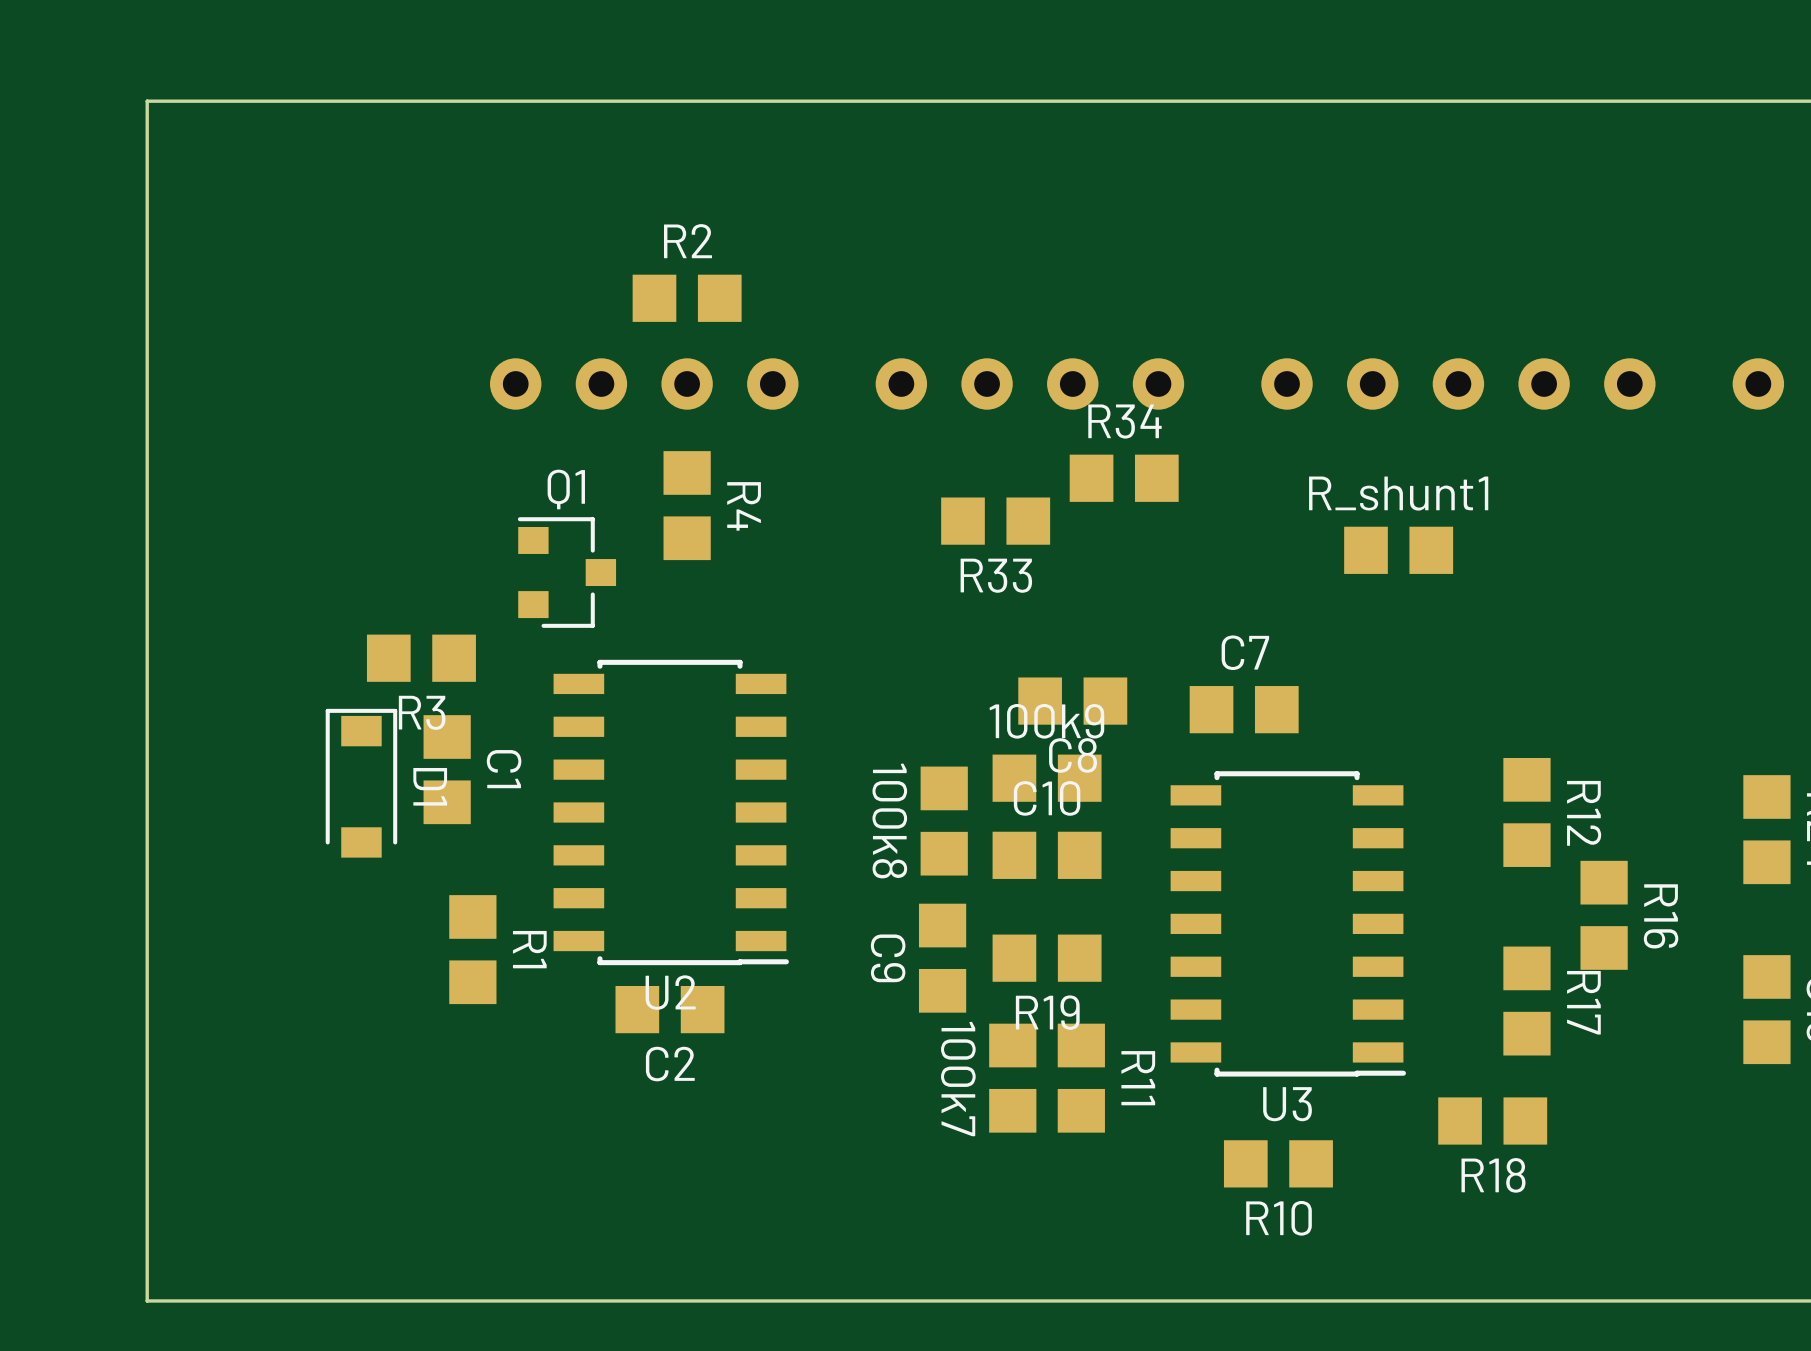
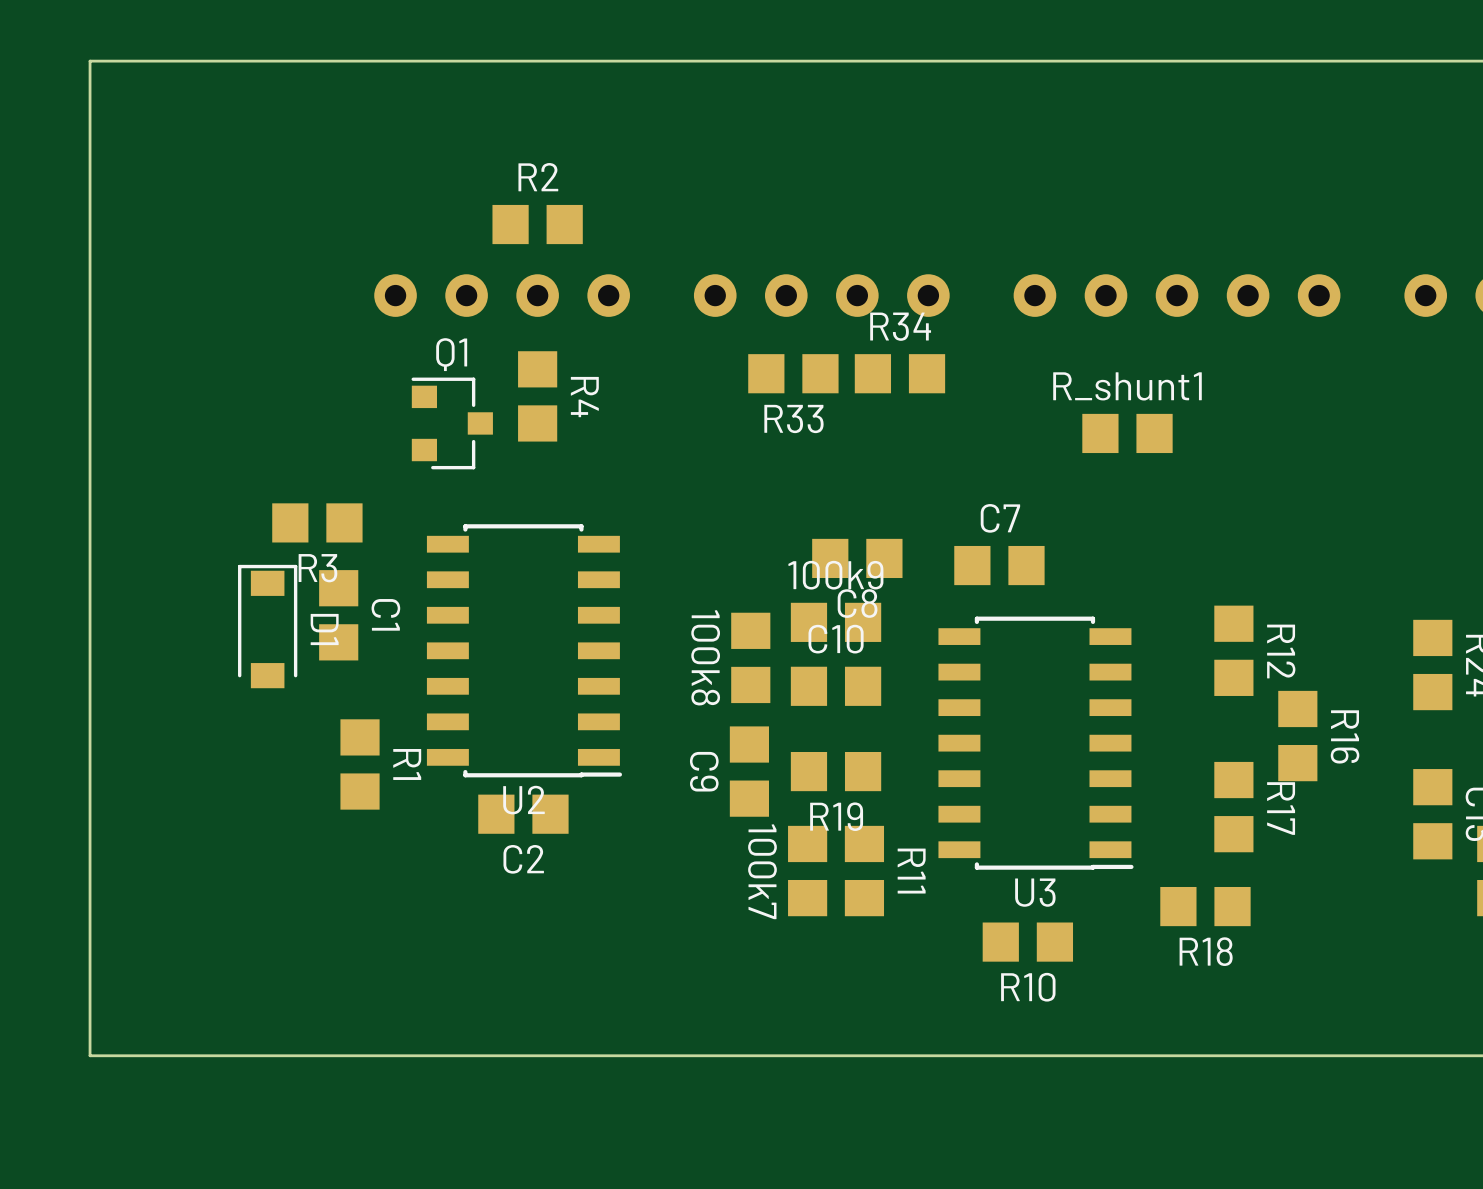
R33 position: (995, 521) -> (793, 373)
Q1 position: (566, 572) -> (452, 423)

